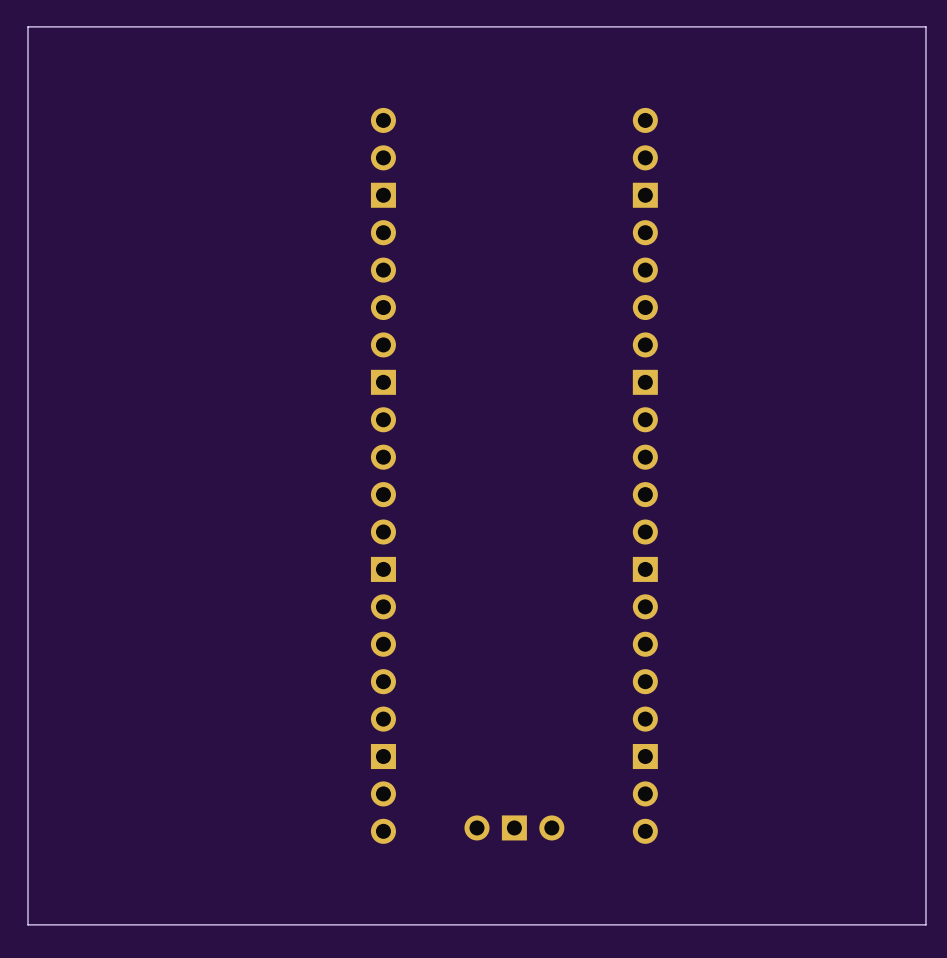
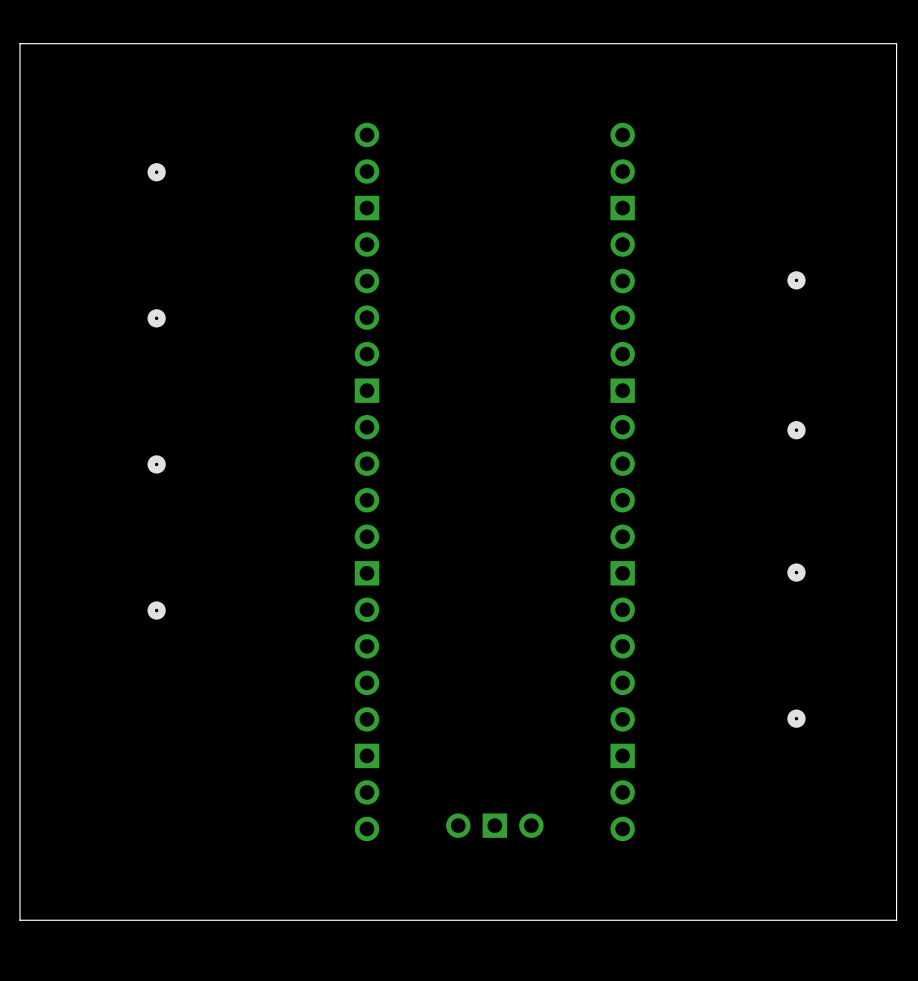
part: none -> (156, 172)
part: none -> (796, 280)
part: none -> (156, 318)
part: none -> (796, 430)
part: none -> (156, 464)
part: none -> (796, 572)
part: none -> (156, 610)
part: none -> (796, 718)

